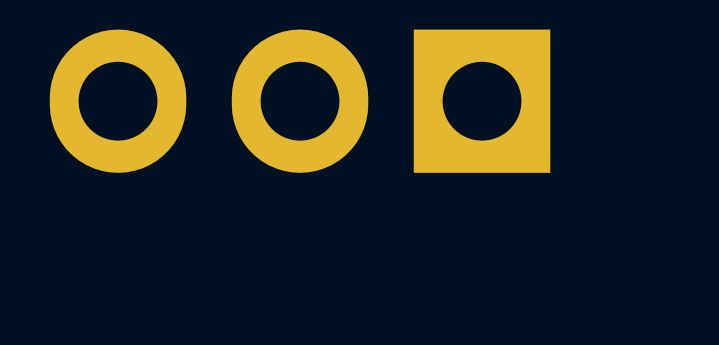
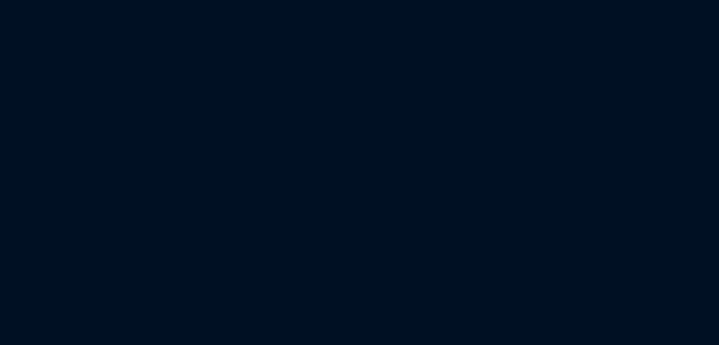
part: (300, 101) -> none

